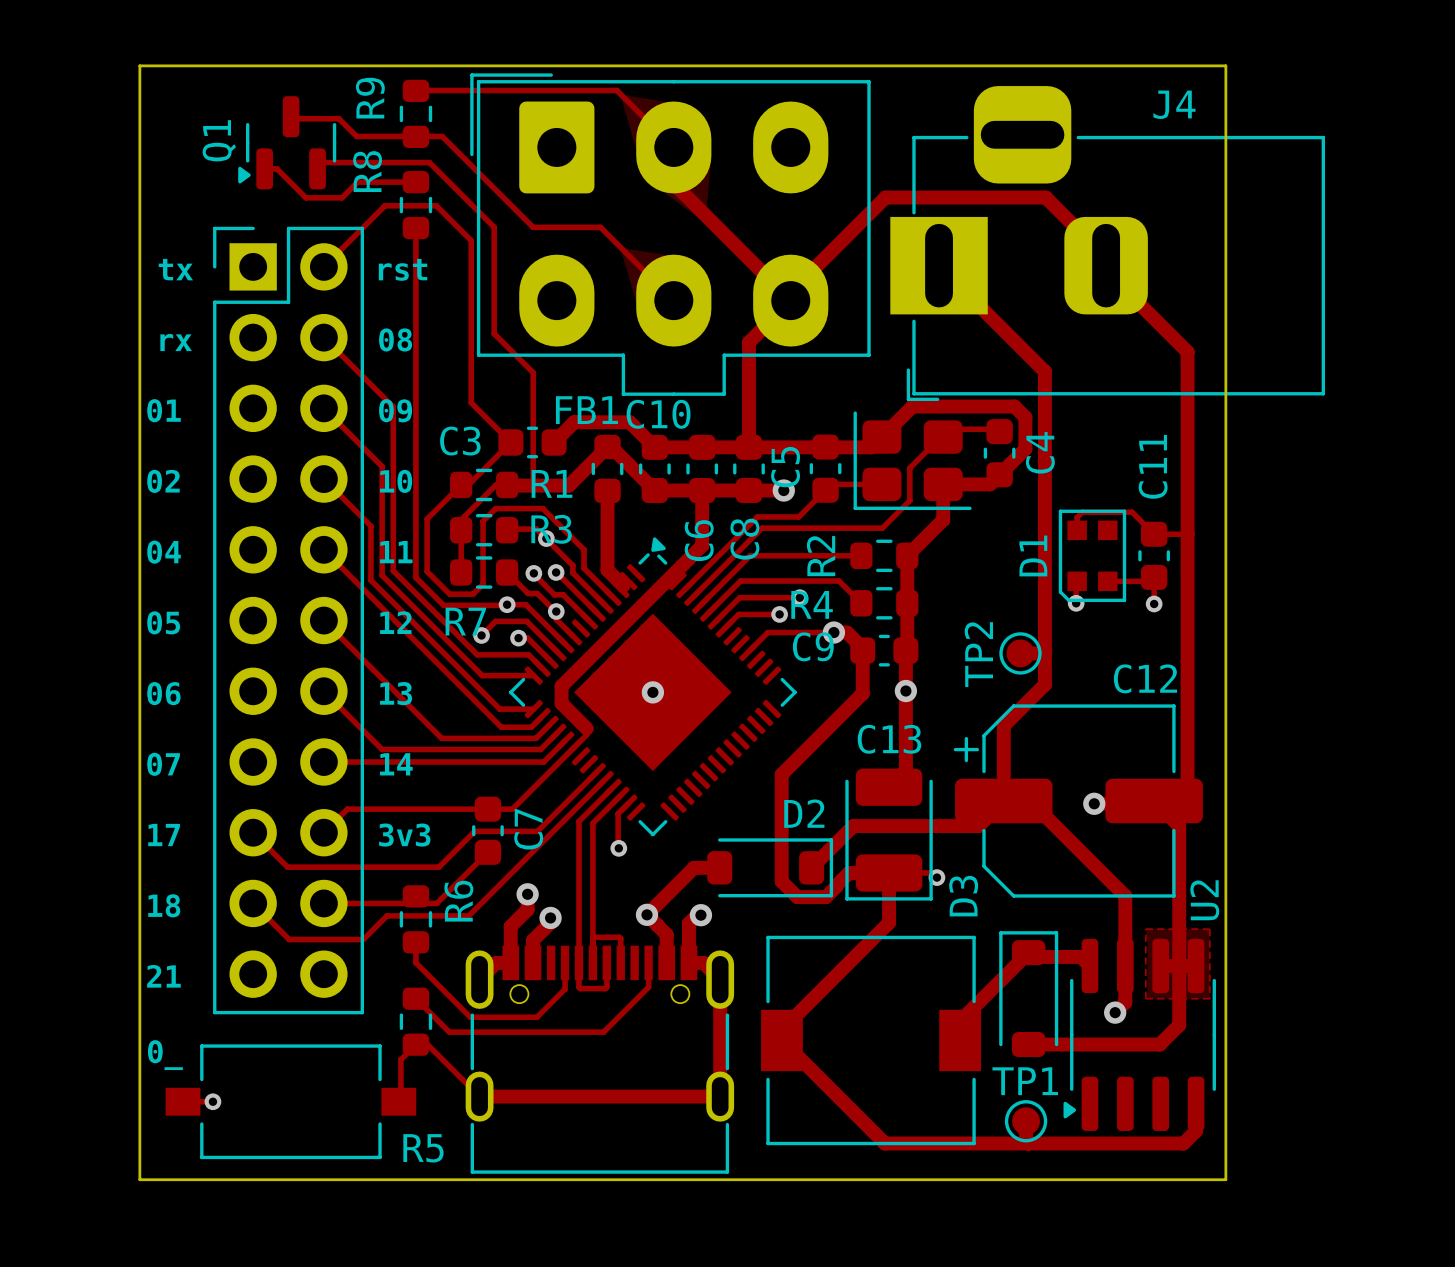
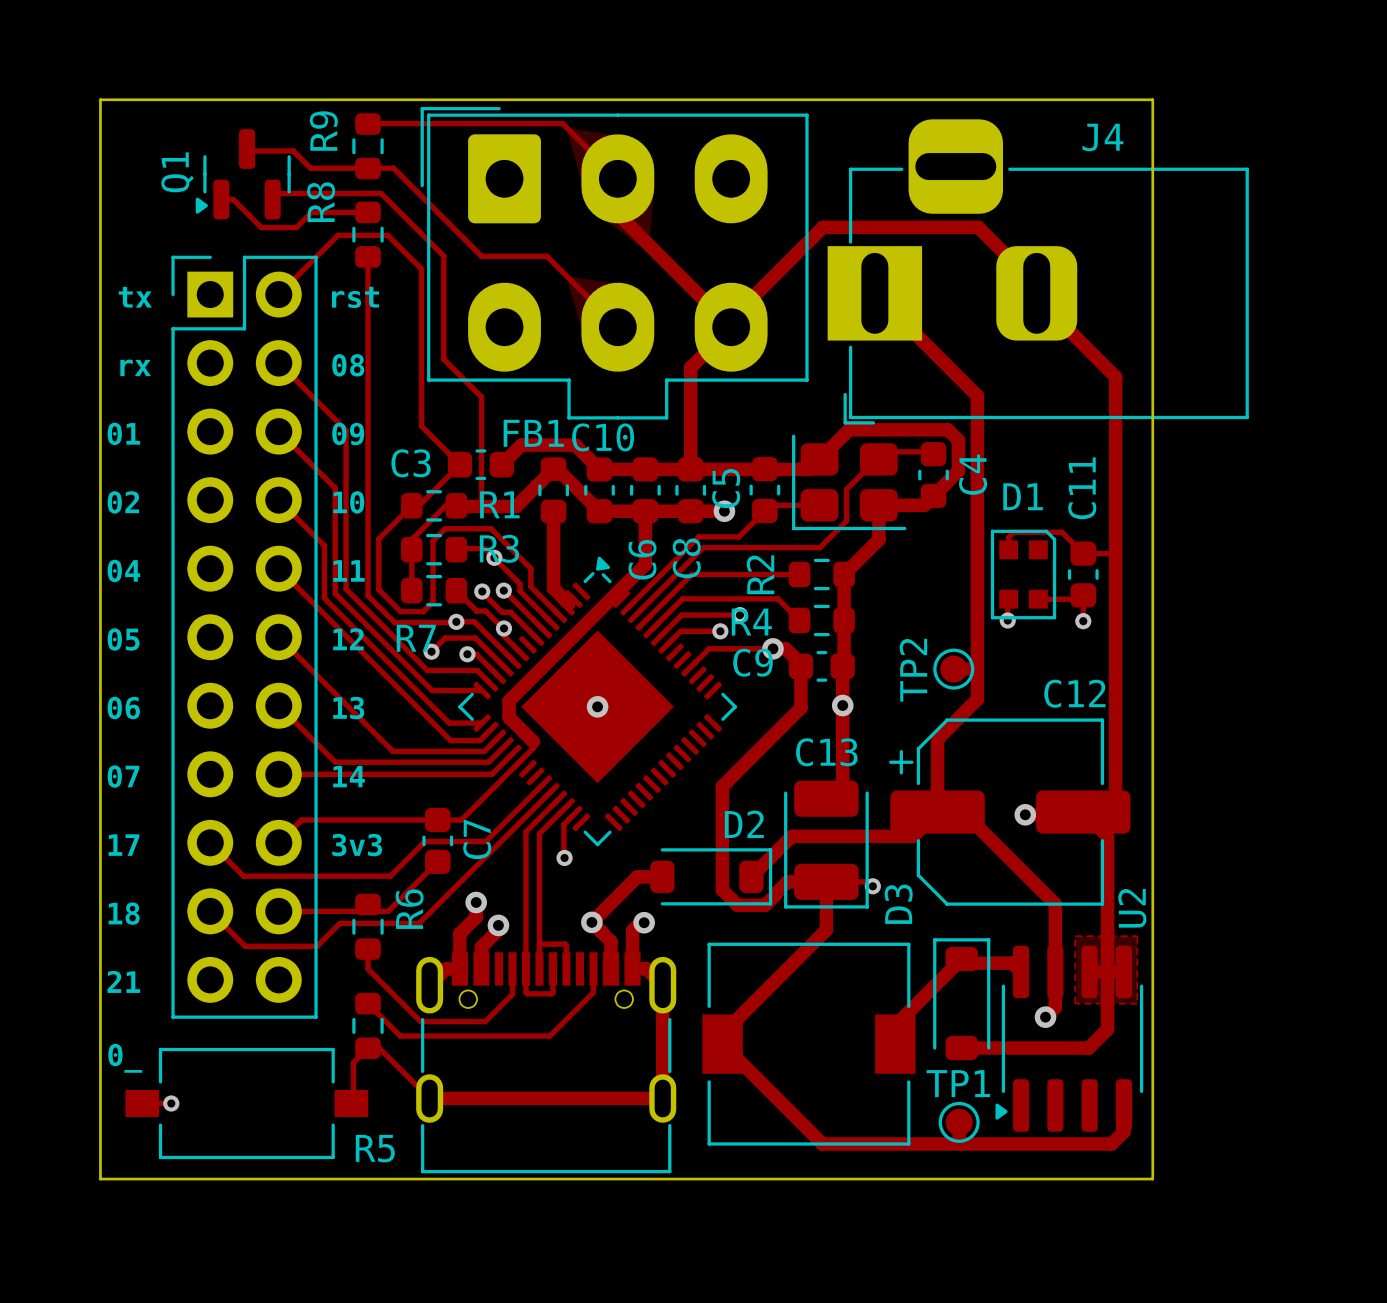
D1 name position: D1 (1033, 555) -> D1 (1023, 496)
D1 rotation: 0° (1092, 555) -> 180° (1023, 574)

